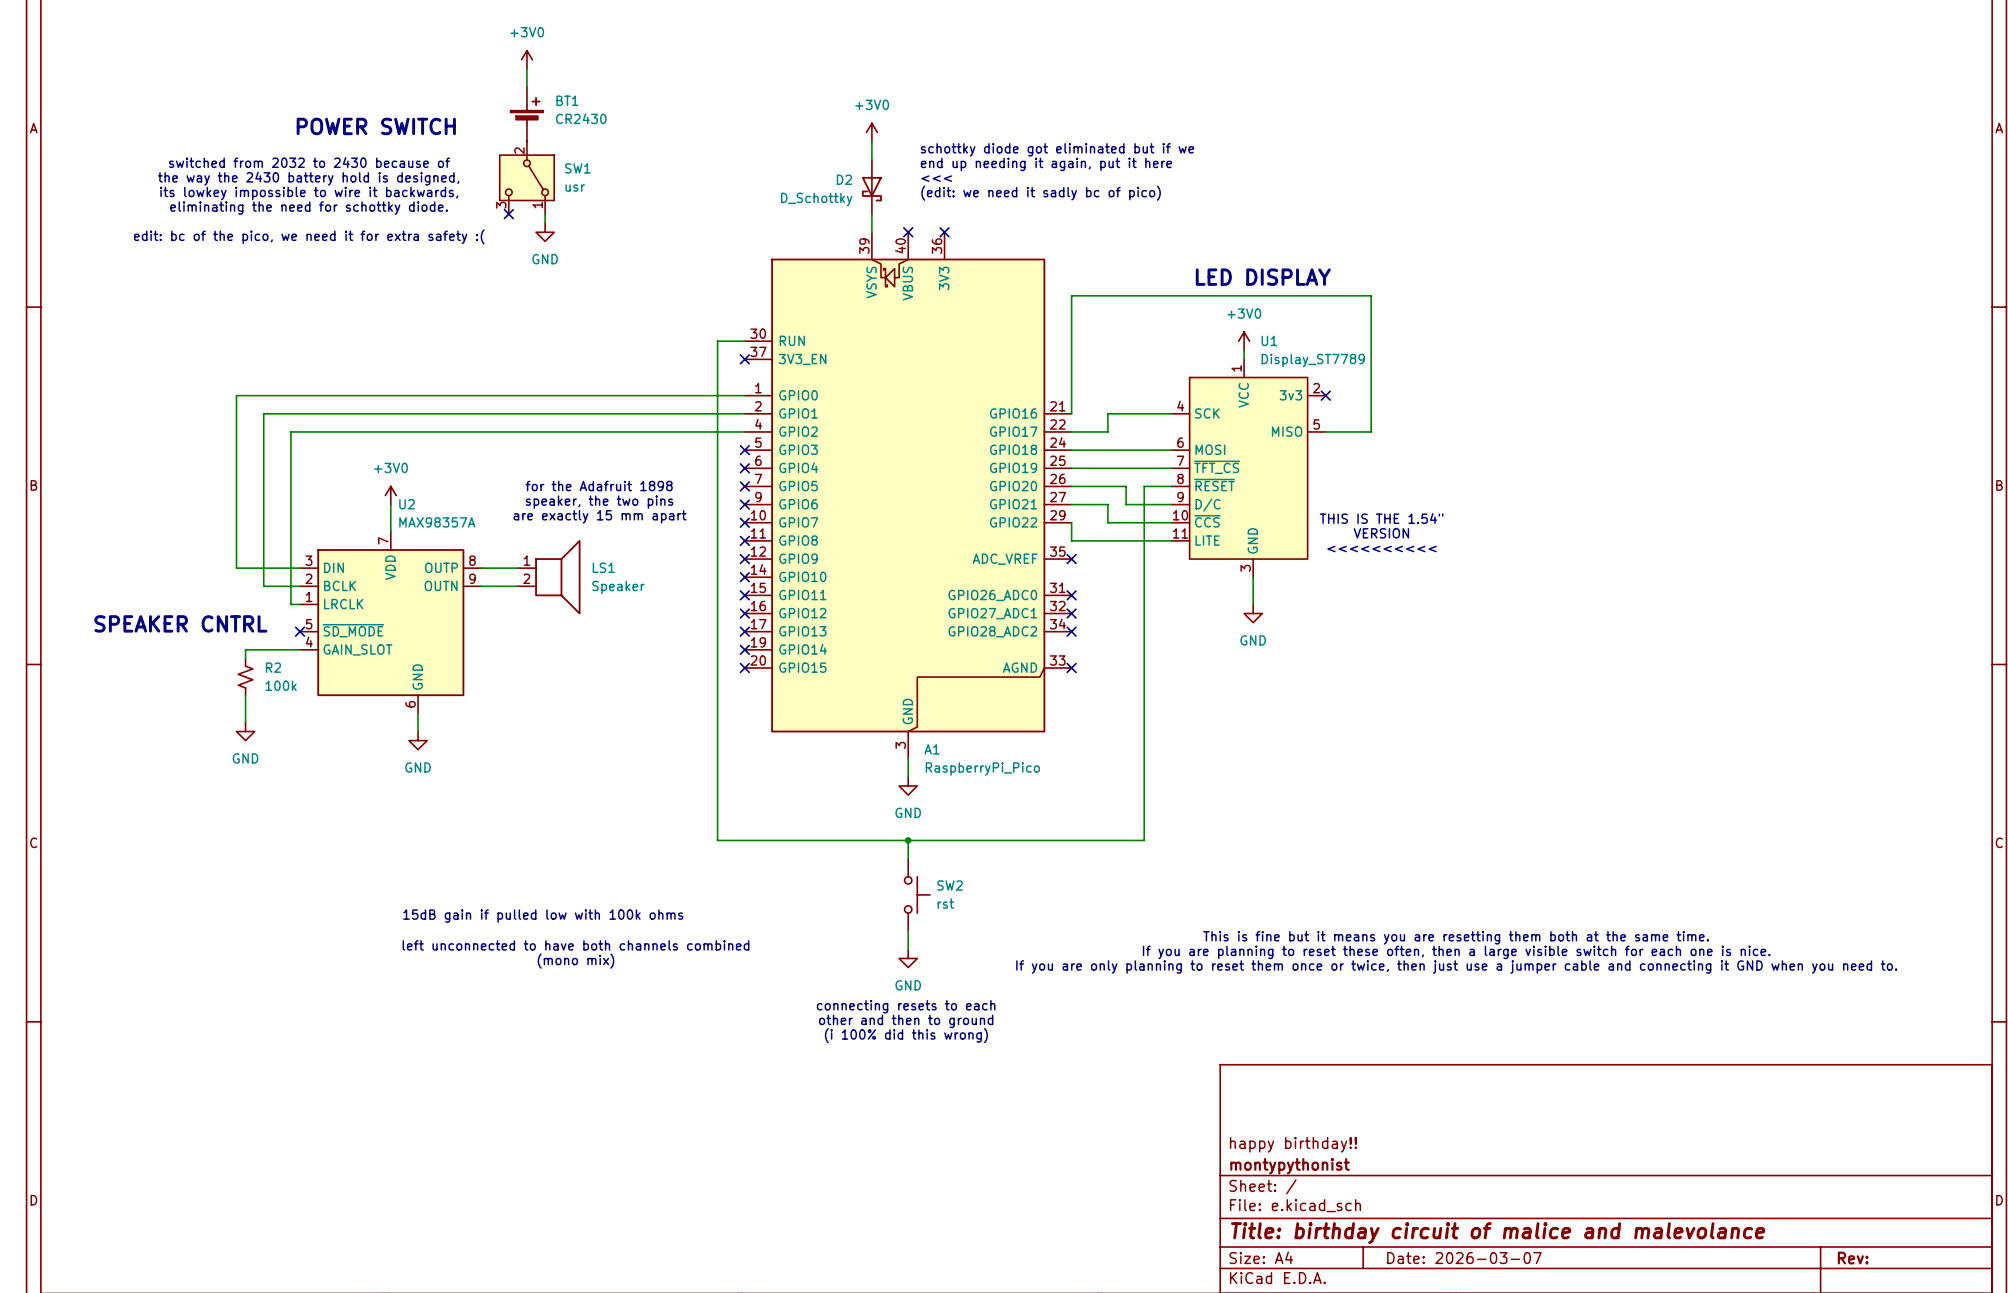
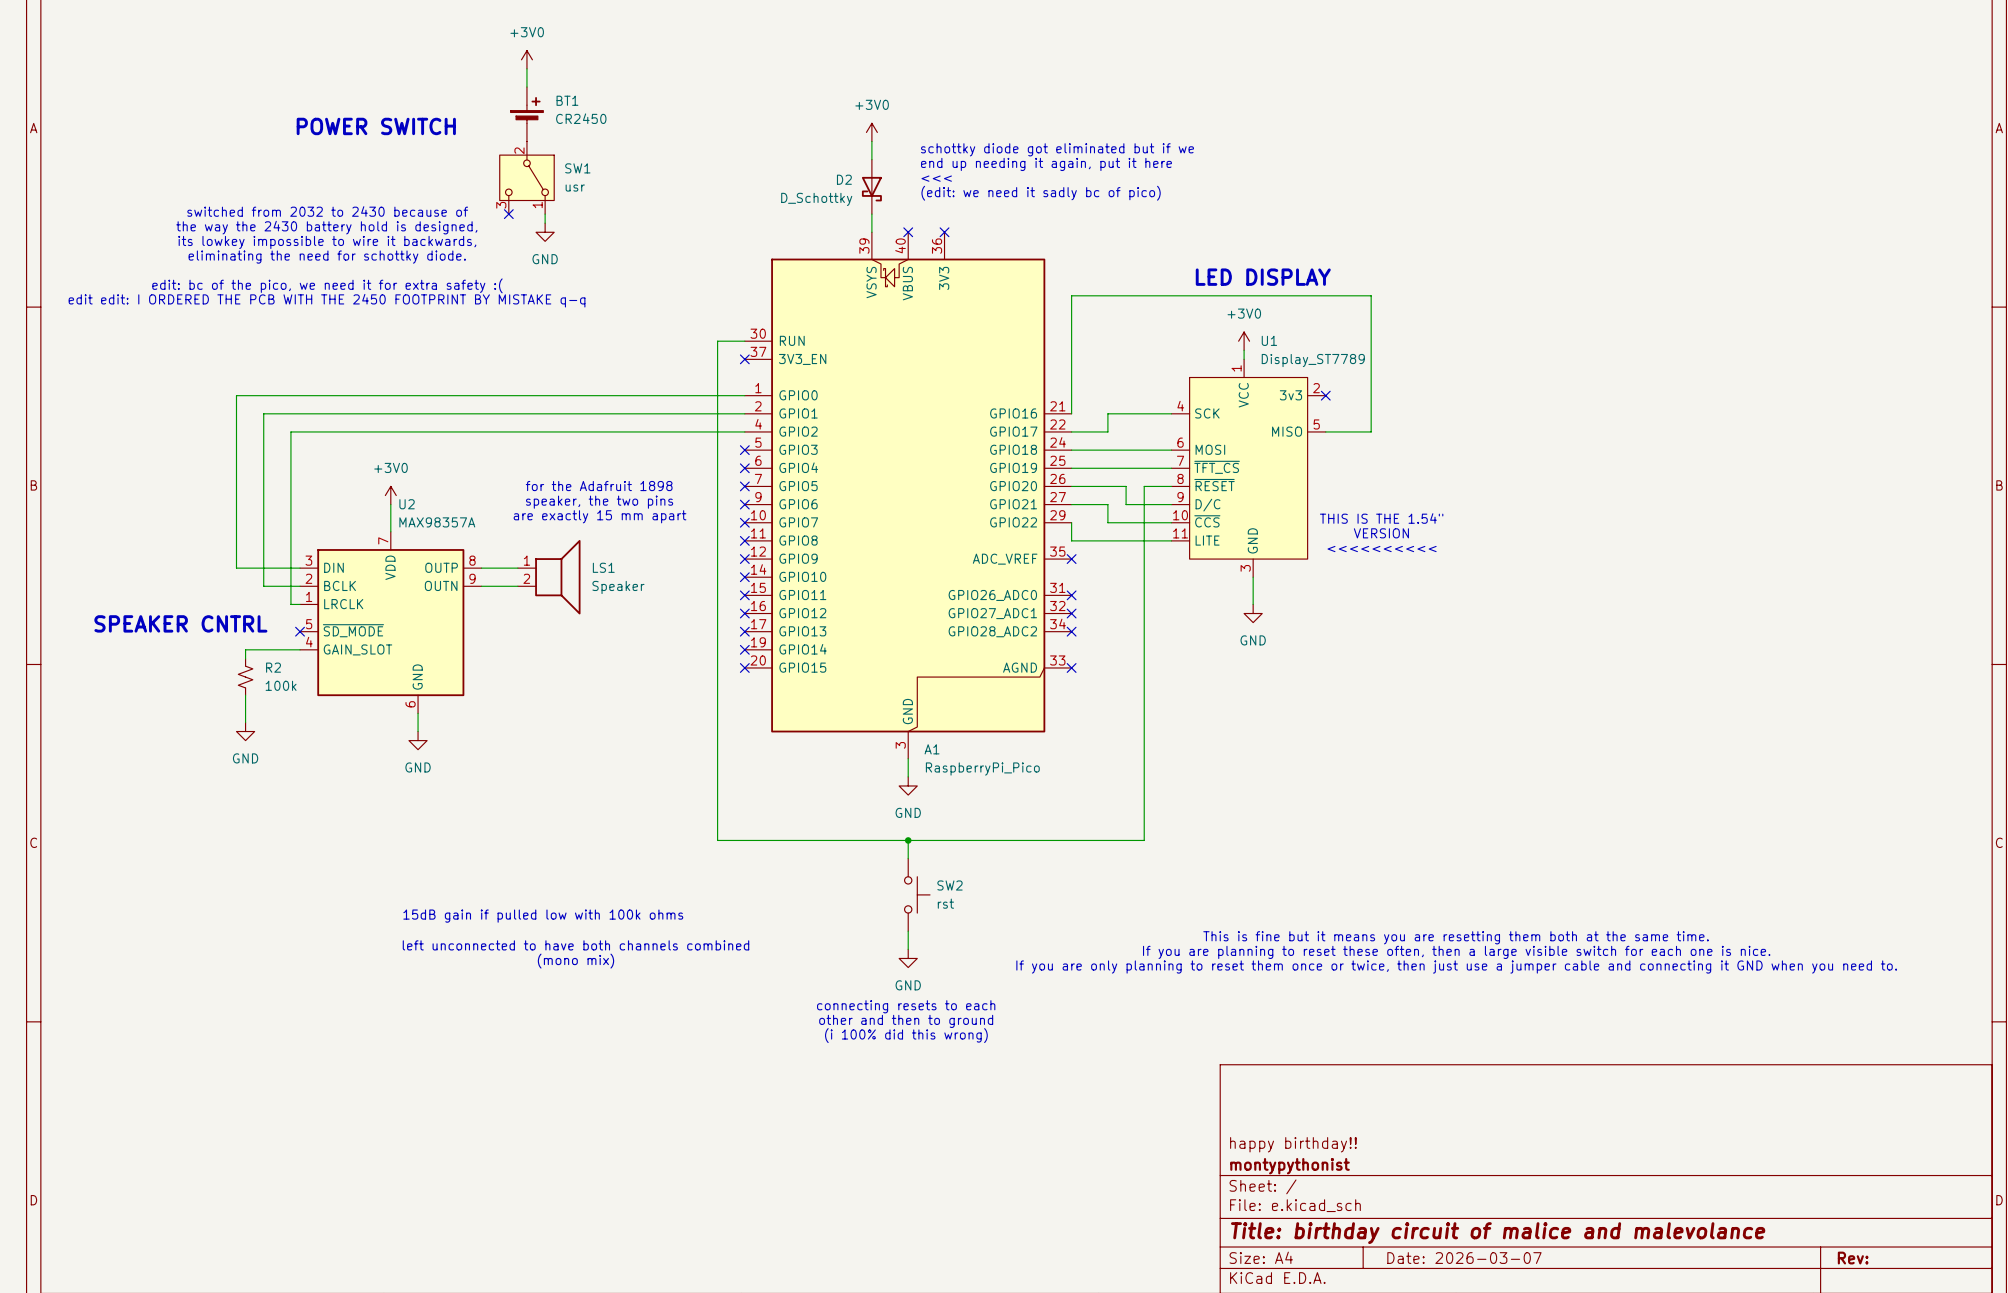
BT1 value: CR2430 (581, 118) -> CR2450 (581, 118)
text position: switched from 2032 to 2430 because of (309, 162) -> switched from 2032 to 2430 because of (327, 211)
text position: the way the 2430 battery hold is designed, (308, 178) -> the way the 2430 battery hold is designed, (326, 227)
text position: its lowkey impossible to wire it backwards, (309, 193) -> its lowkey impossible to wire it backwards, (327, 242)
text position: eliminating the need for schottky diode. (309, 208) -> eliminating the need for schottky diode. (327, 257)
text position: edit: bc of the pico, we need it for extra safety :( (309, 236) -> edit: bc of the pico, we need it for extra safety :( (327, 285)
text: none -> edit edit: I ORDERED THE PCB WITH THE 2450 FOOTPRINT BY MISTAKE q-q (327, 300)

